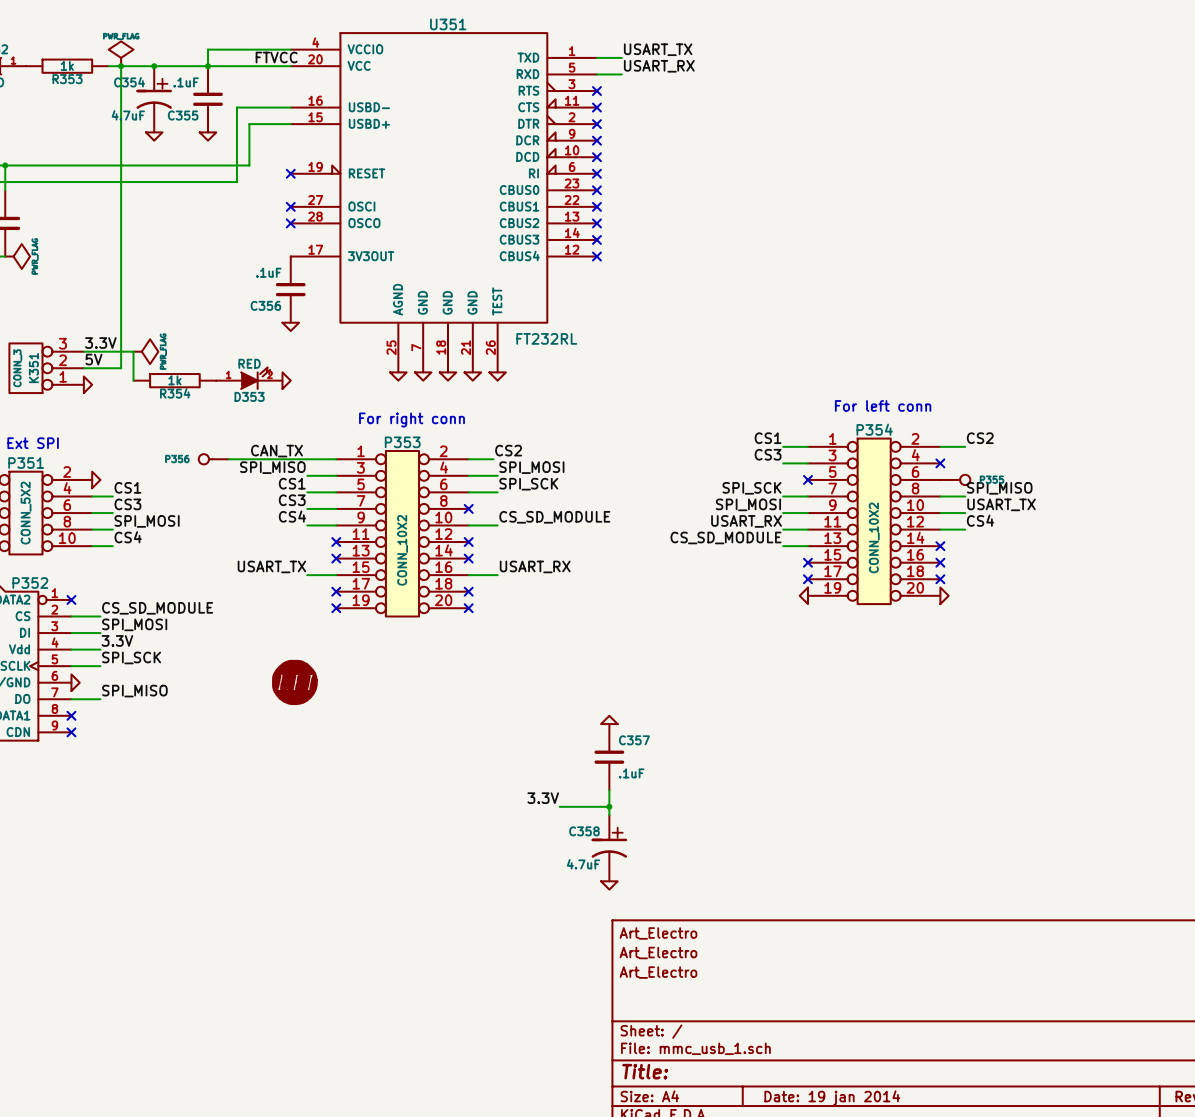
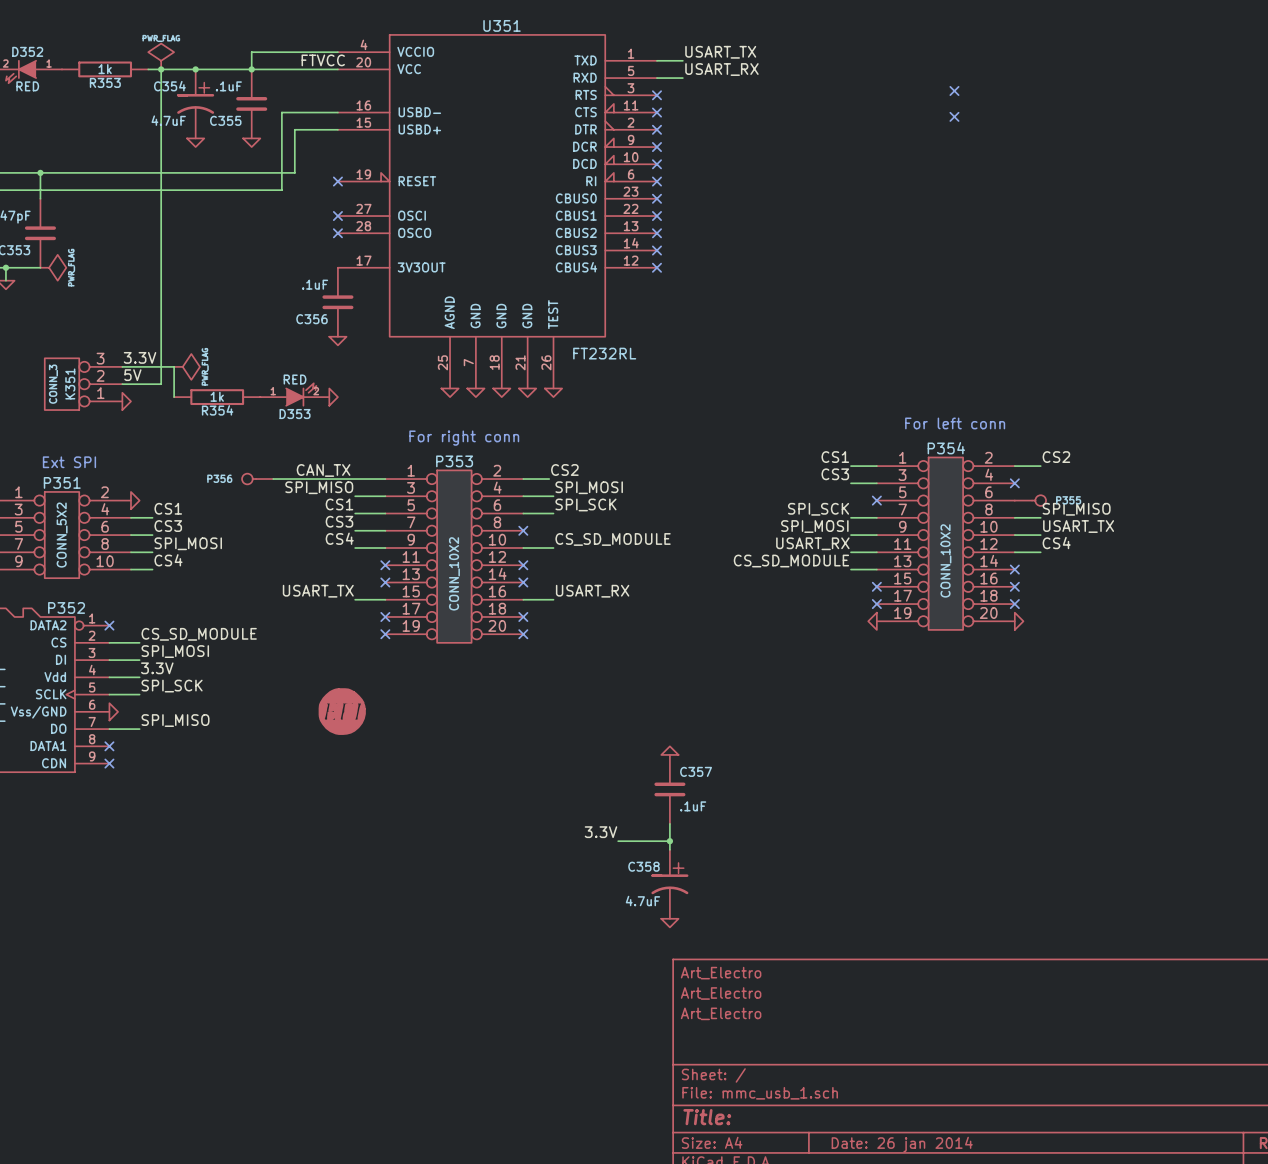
no-connect mark: none -> (954, 90)
no-connect mark: none -> (954, 116)
title block: Date: 19 jan 2014 (832, 1097) -> Date: 26 jan 2014 (902, 1144)

